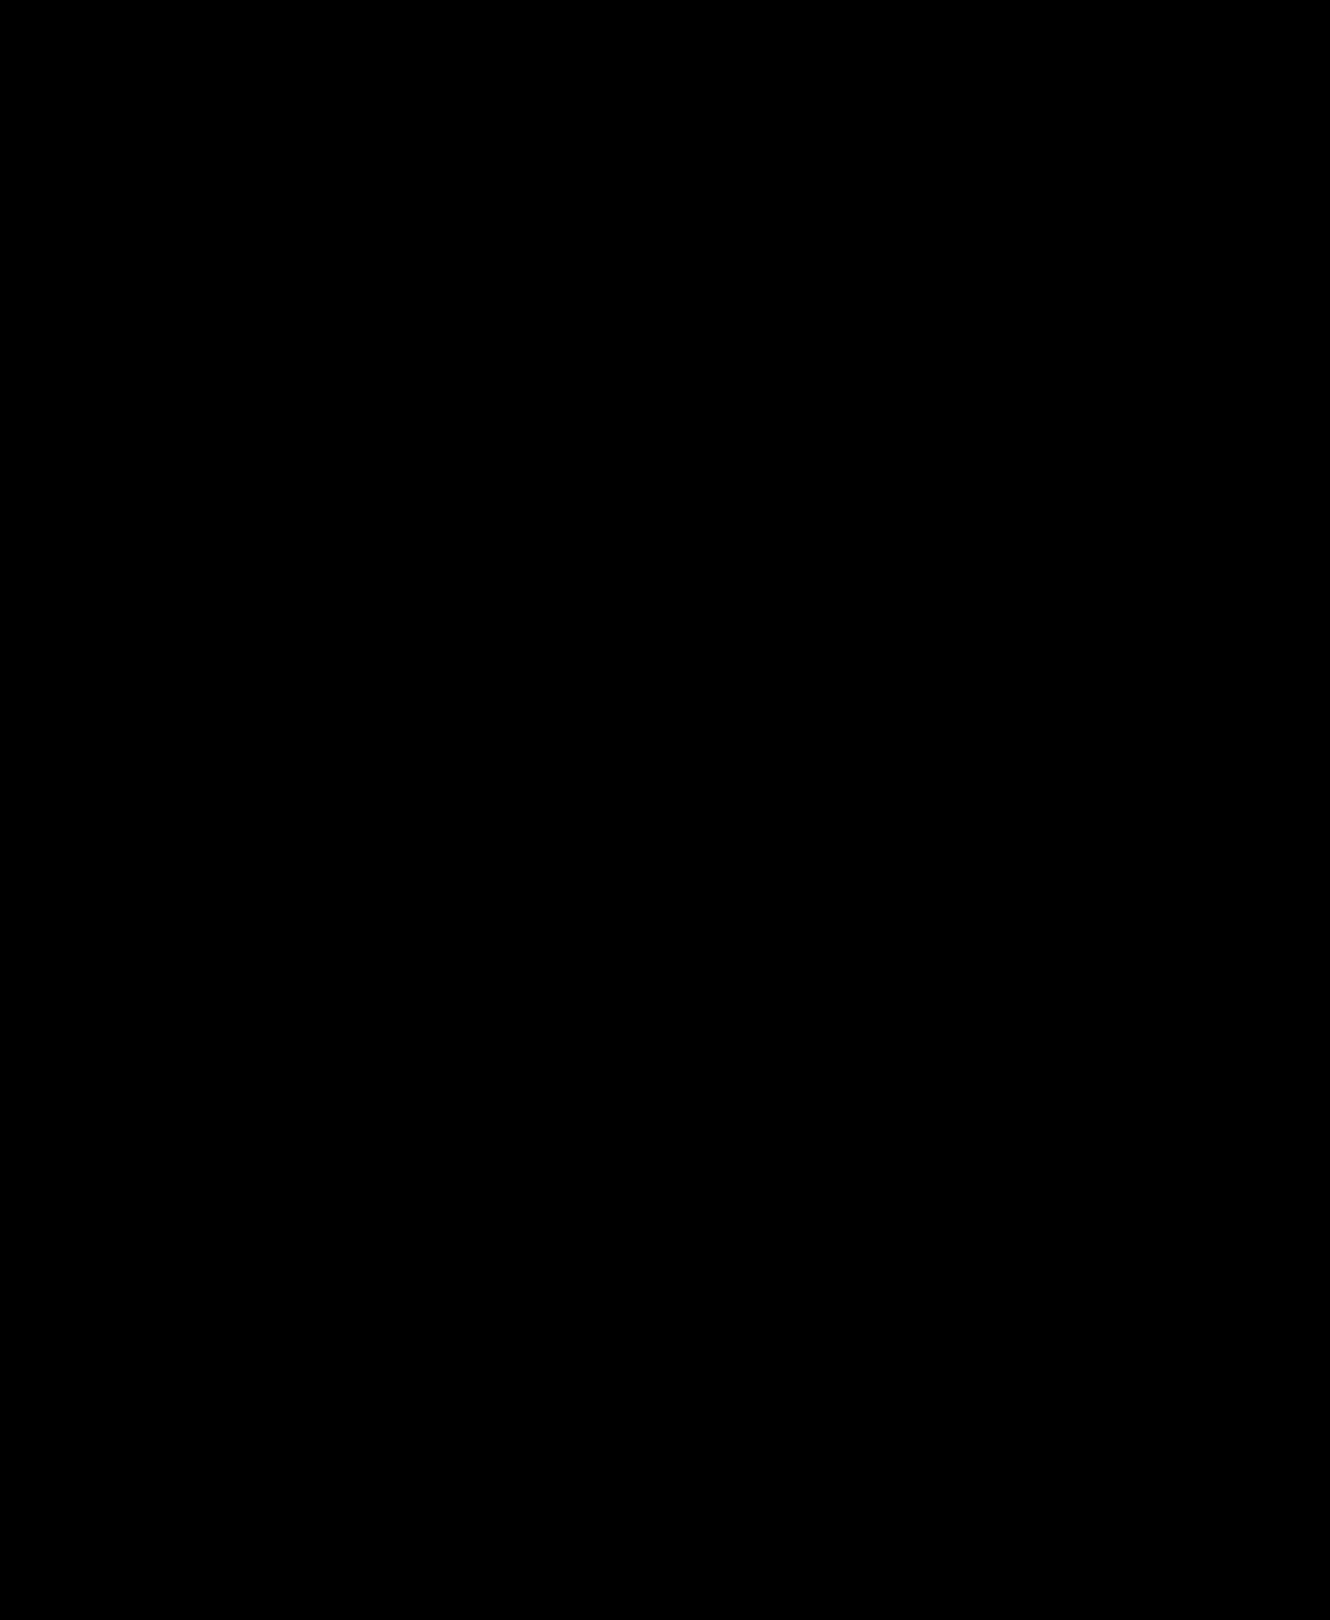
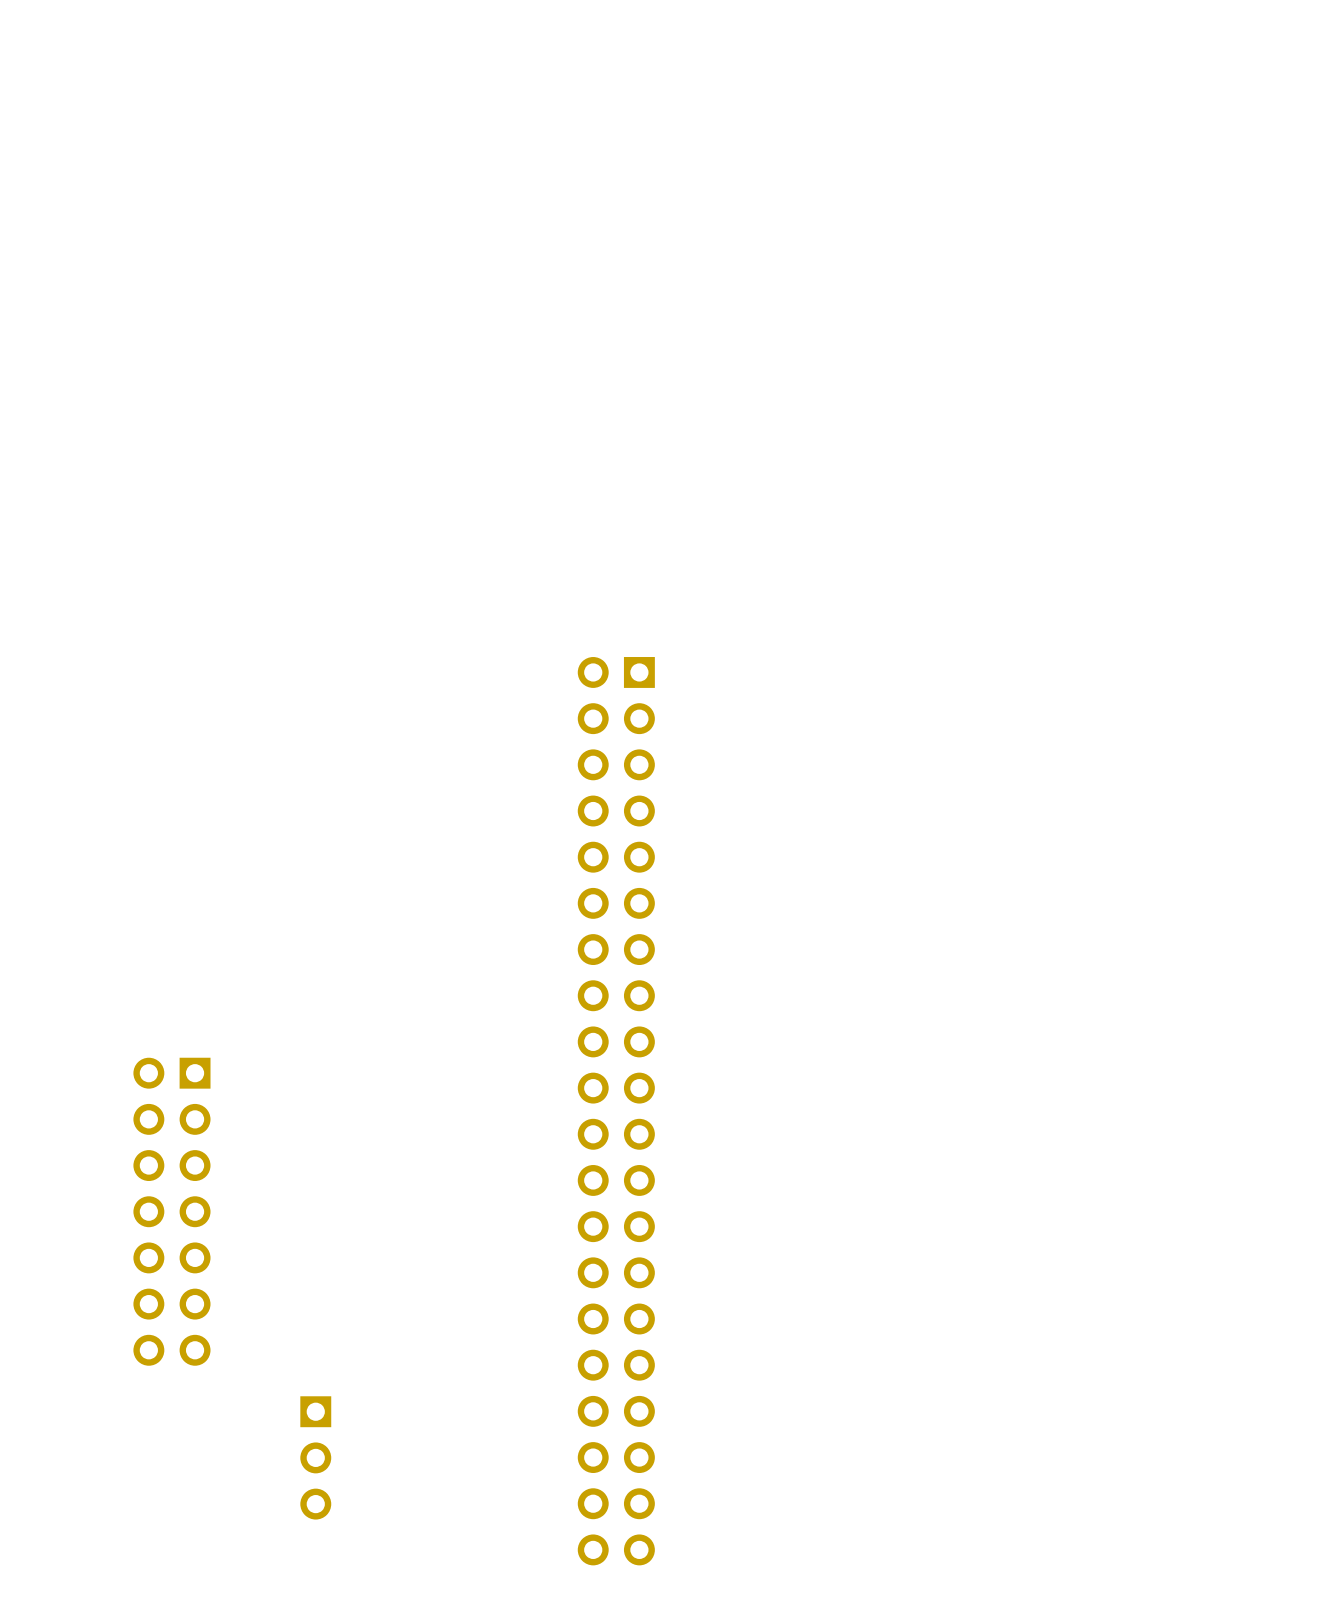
part: none -> (616, 1111)
part: none -> (171, 1211)
part: none -> (315, 1457)

